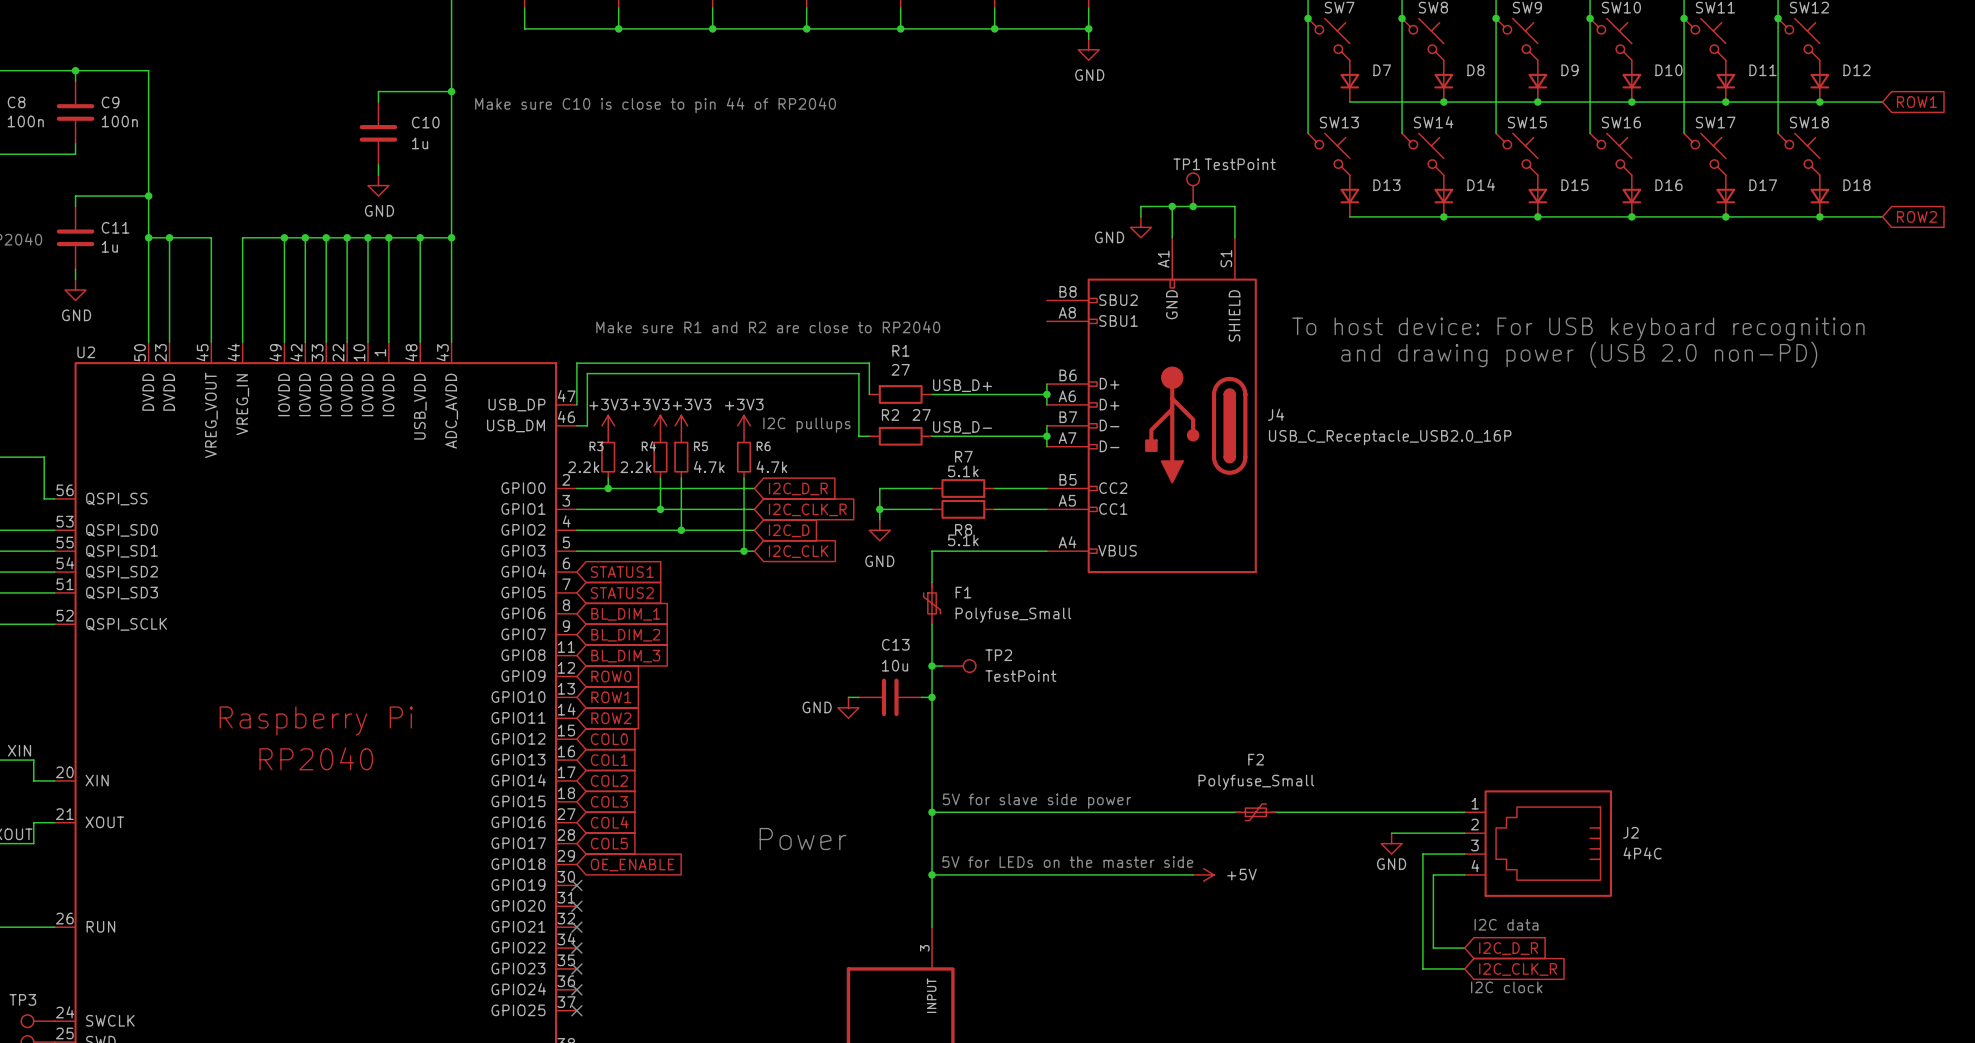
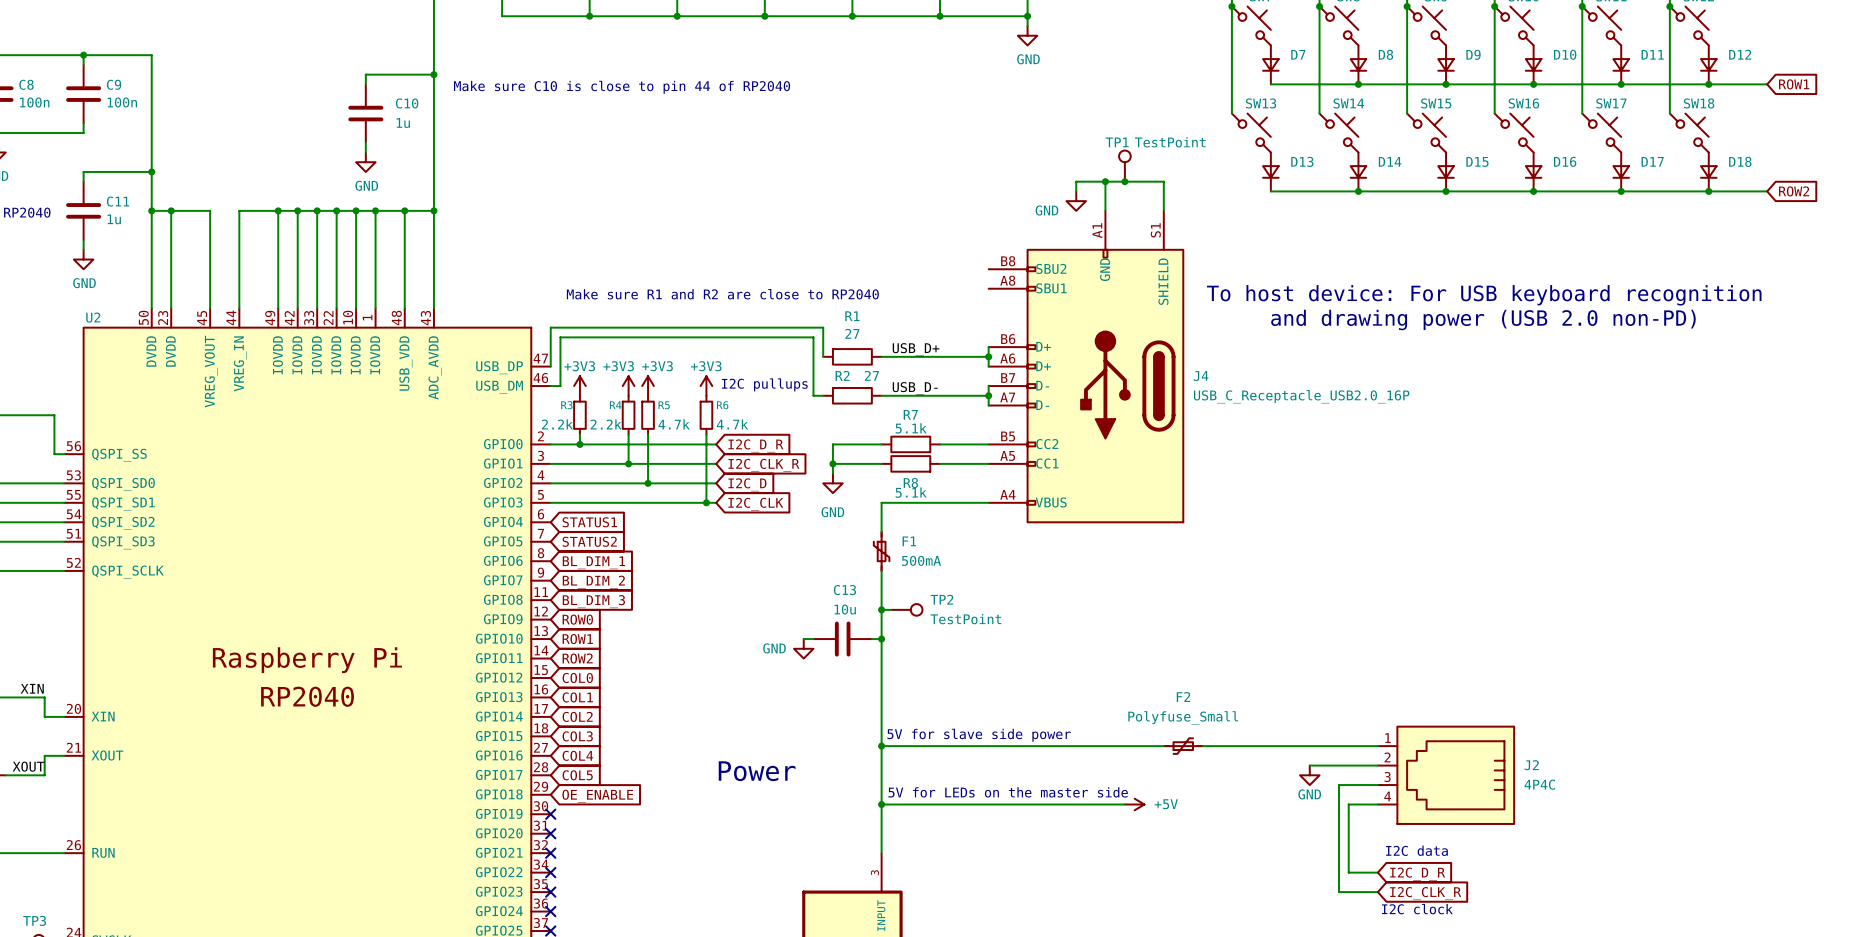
F1 value: Polyfuse_Small (1013, 615) -> 500mA (921, 560)

